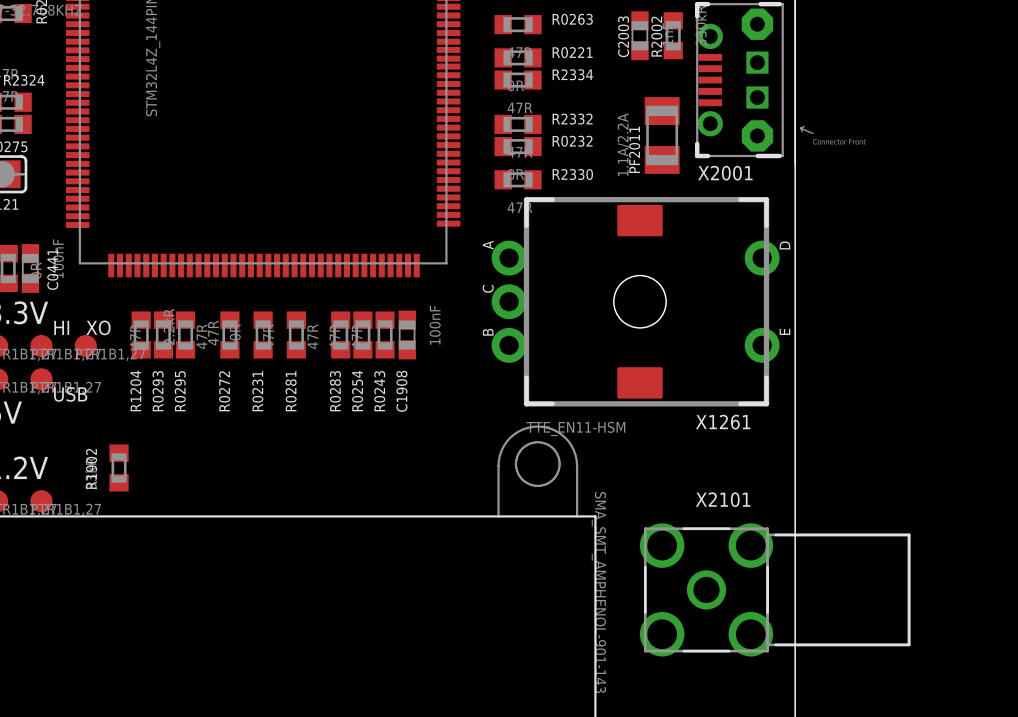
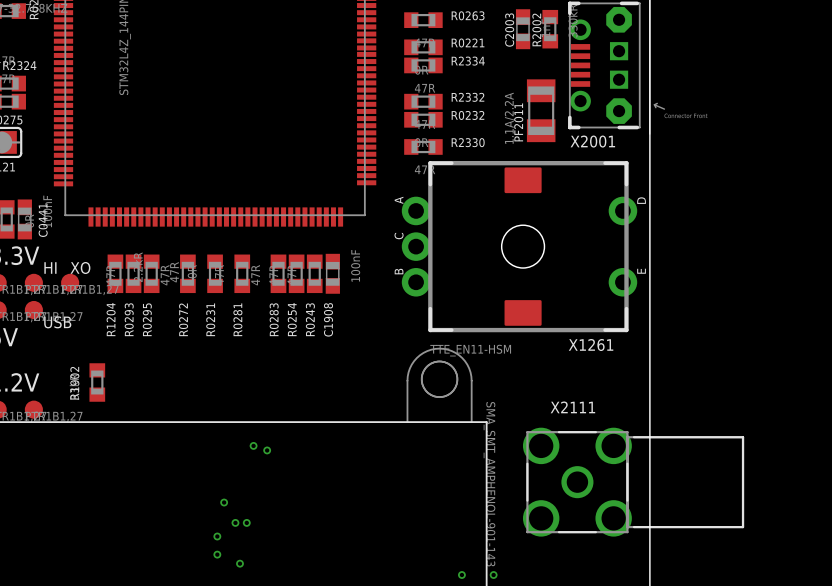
X2101 name: X2101 (723, 499) -> X2111 (572, 407)
via: none -> (253, 445)
via: none -> (267, 450)
via: none -> (224, 502)
via: none -> (235, 522)
via: none -> (246, 522)
via: none -> (217, 536)
via: none -> (217, 554)
via: none -> (239, 563)
via: none -> (461, 575)
via: none -> (493, 575)

